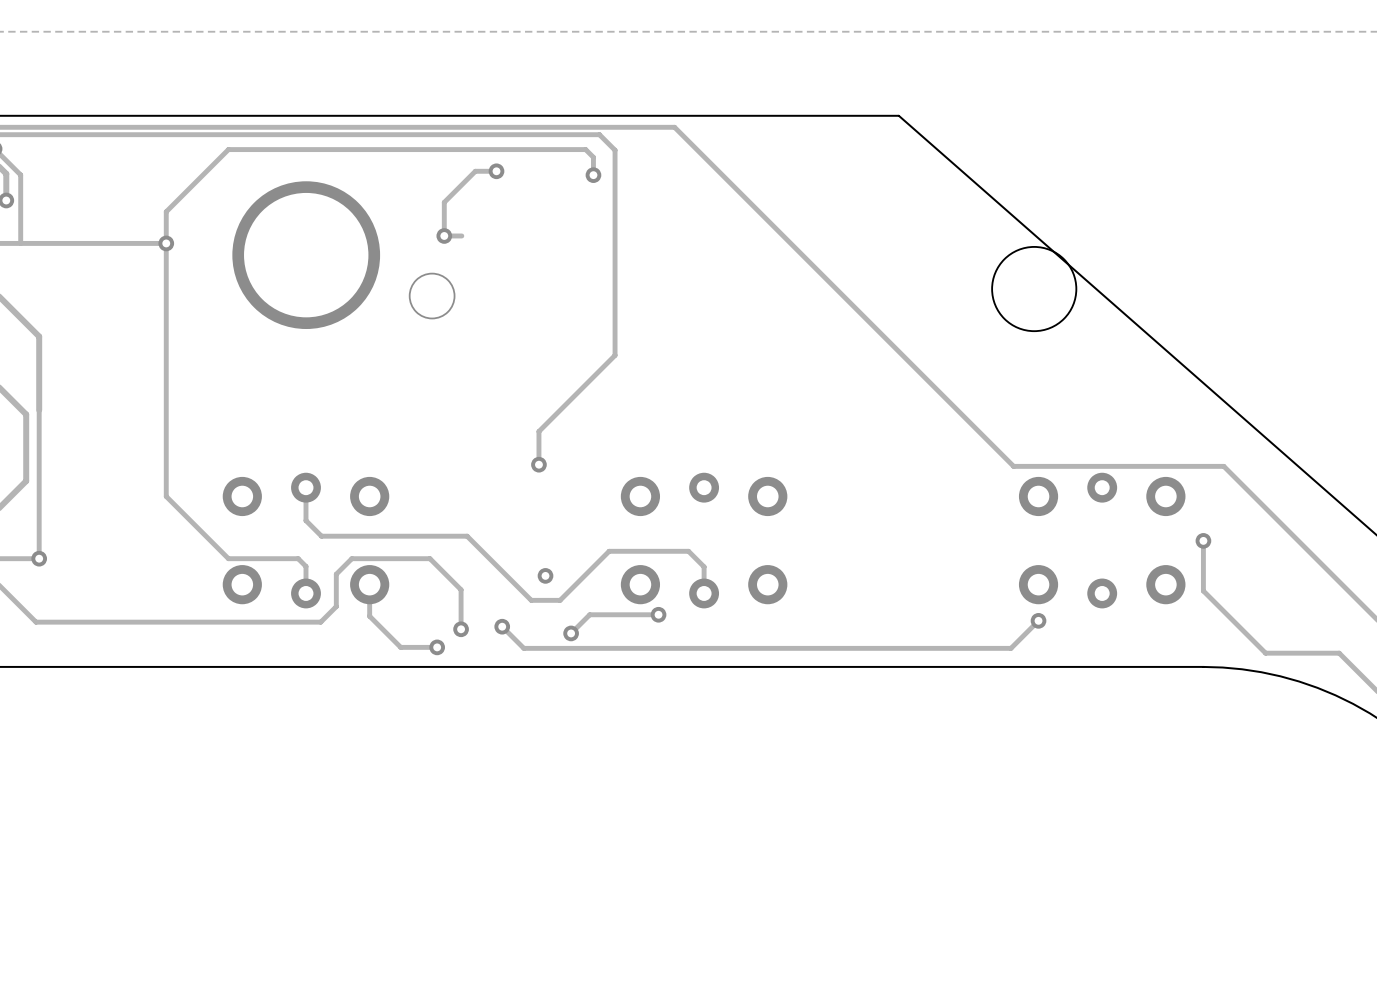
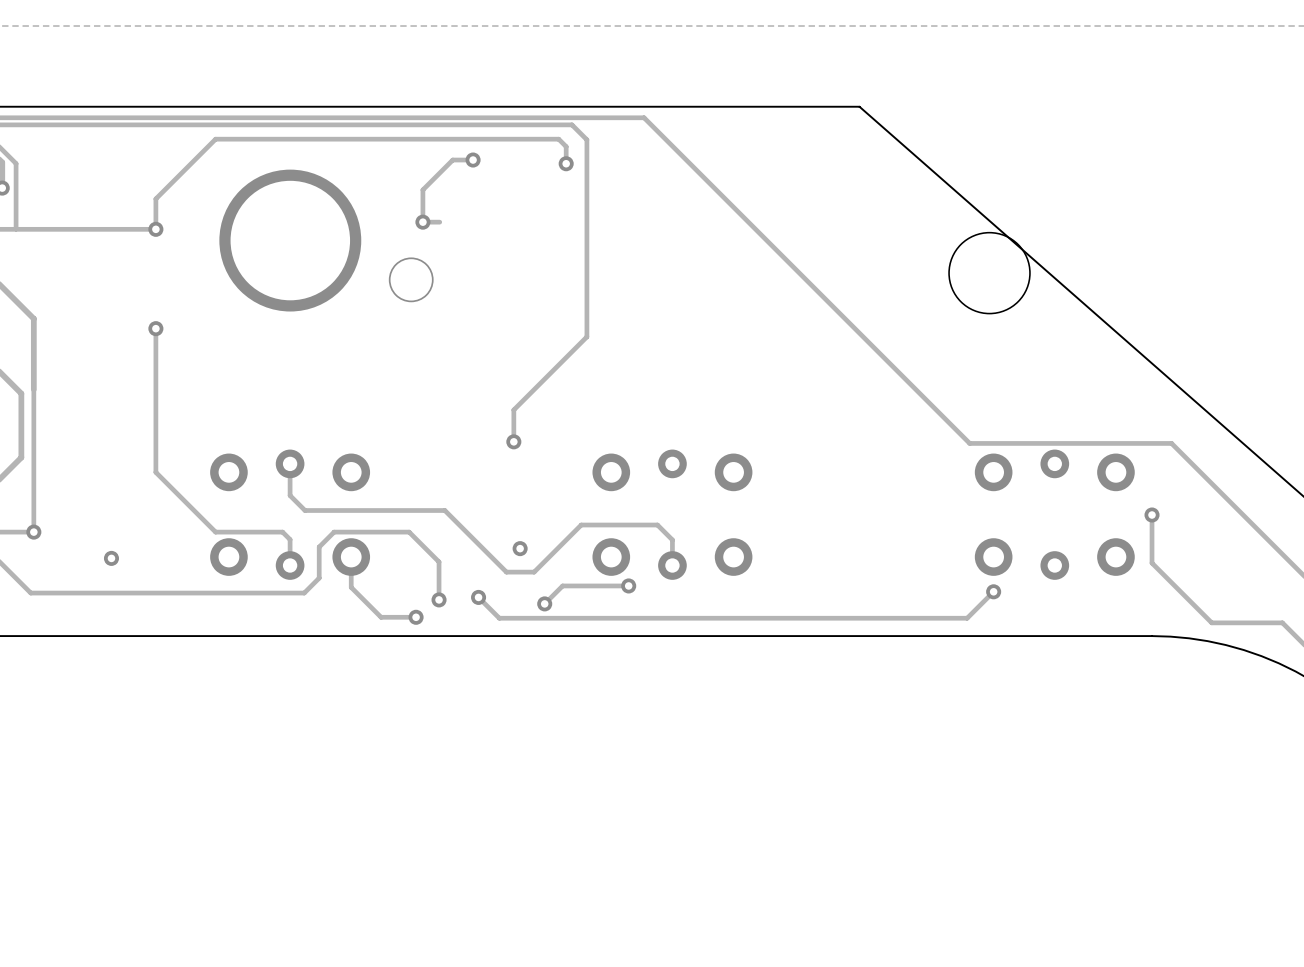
track: (166, 243) (166, 346) -> none
via: none -> (155, 328)
via: none -> (111, 558)

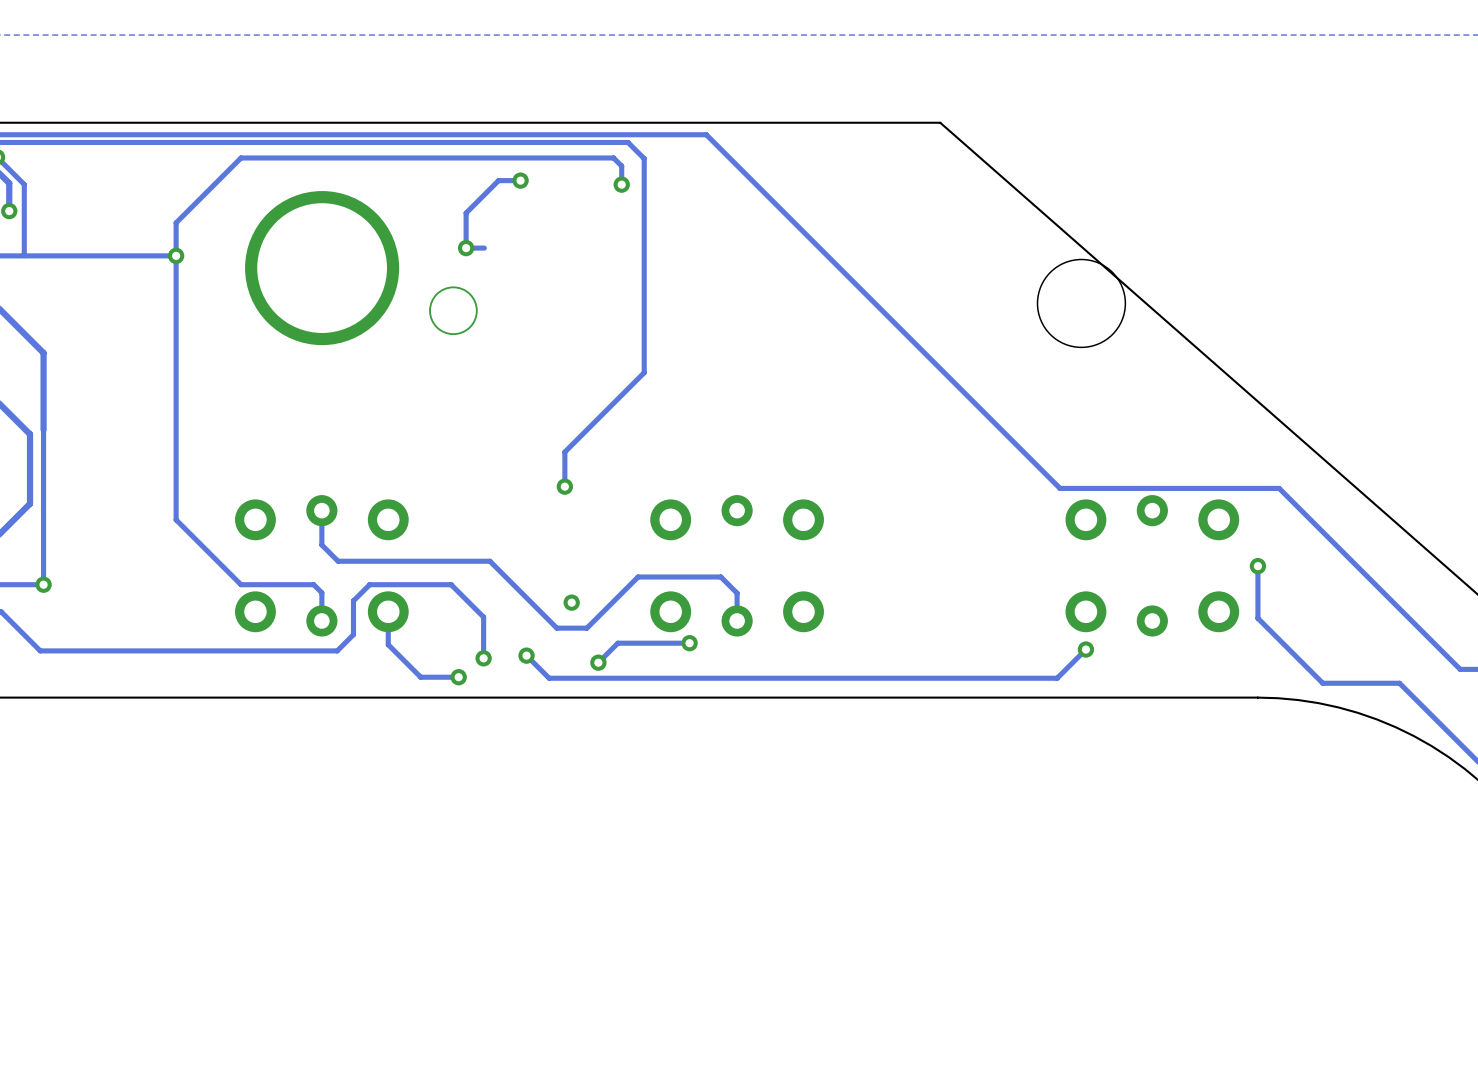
track: none -> (176, 255) (176, 363)
via: (155, 328) -> none
via: (111, 558) -> none

